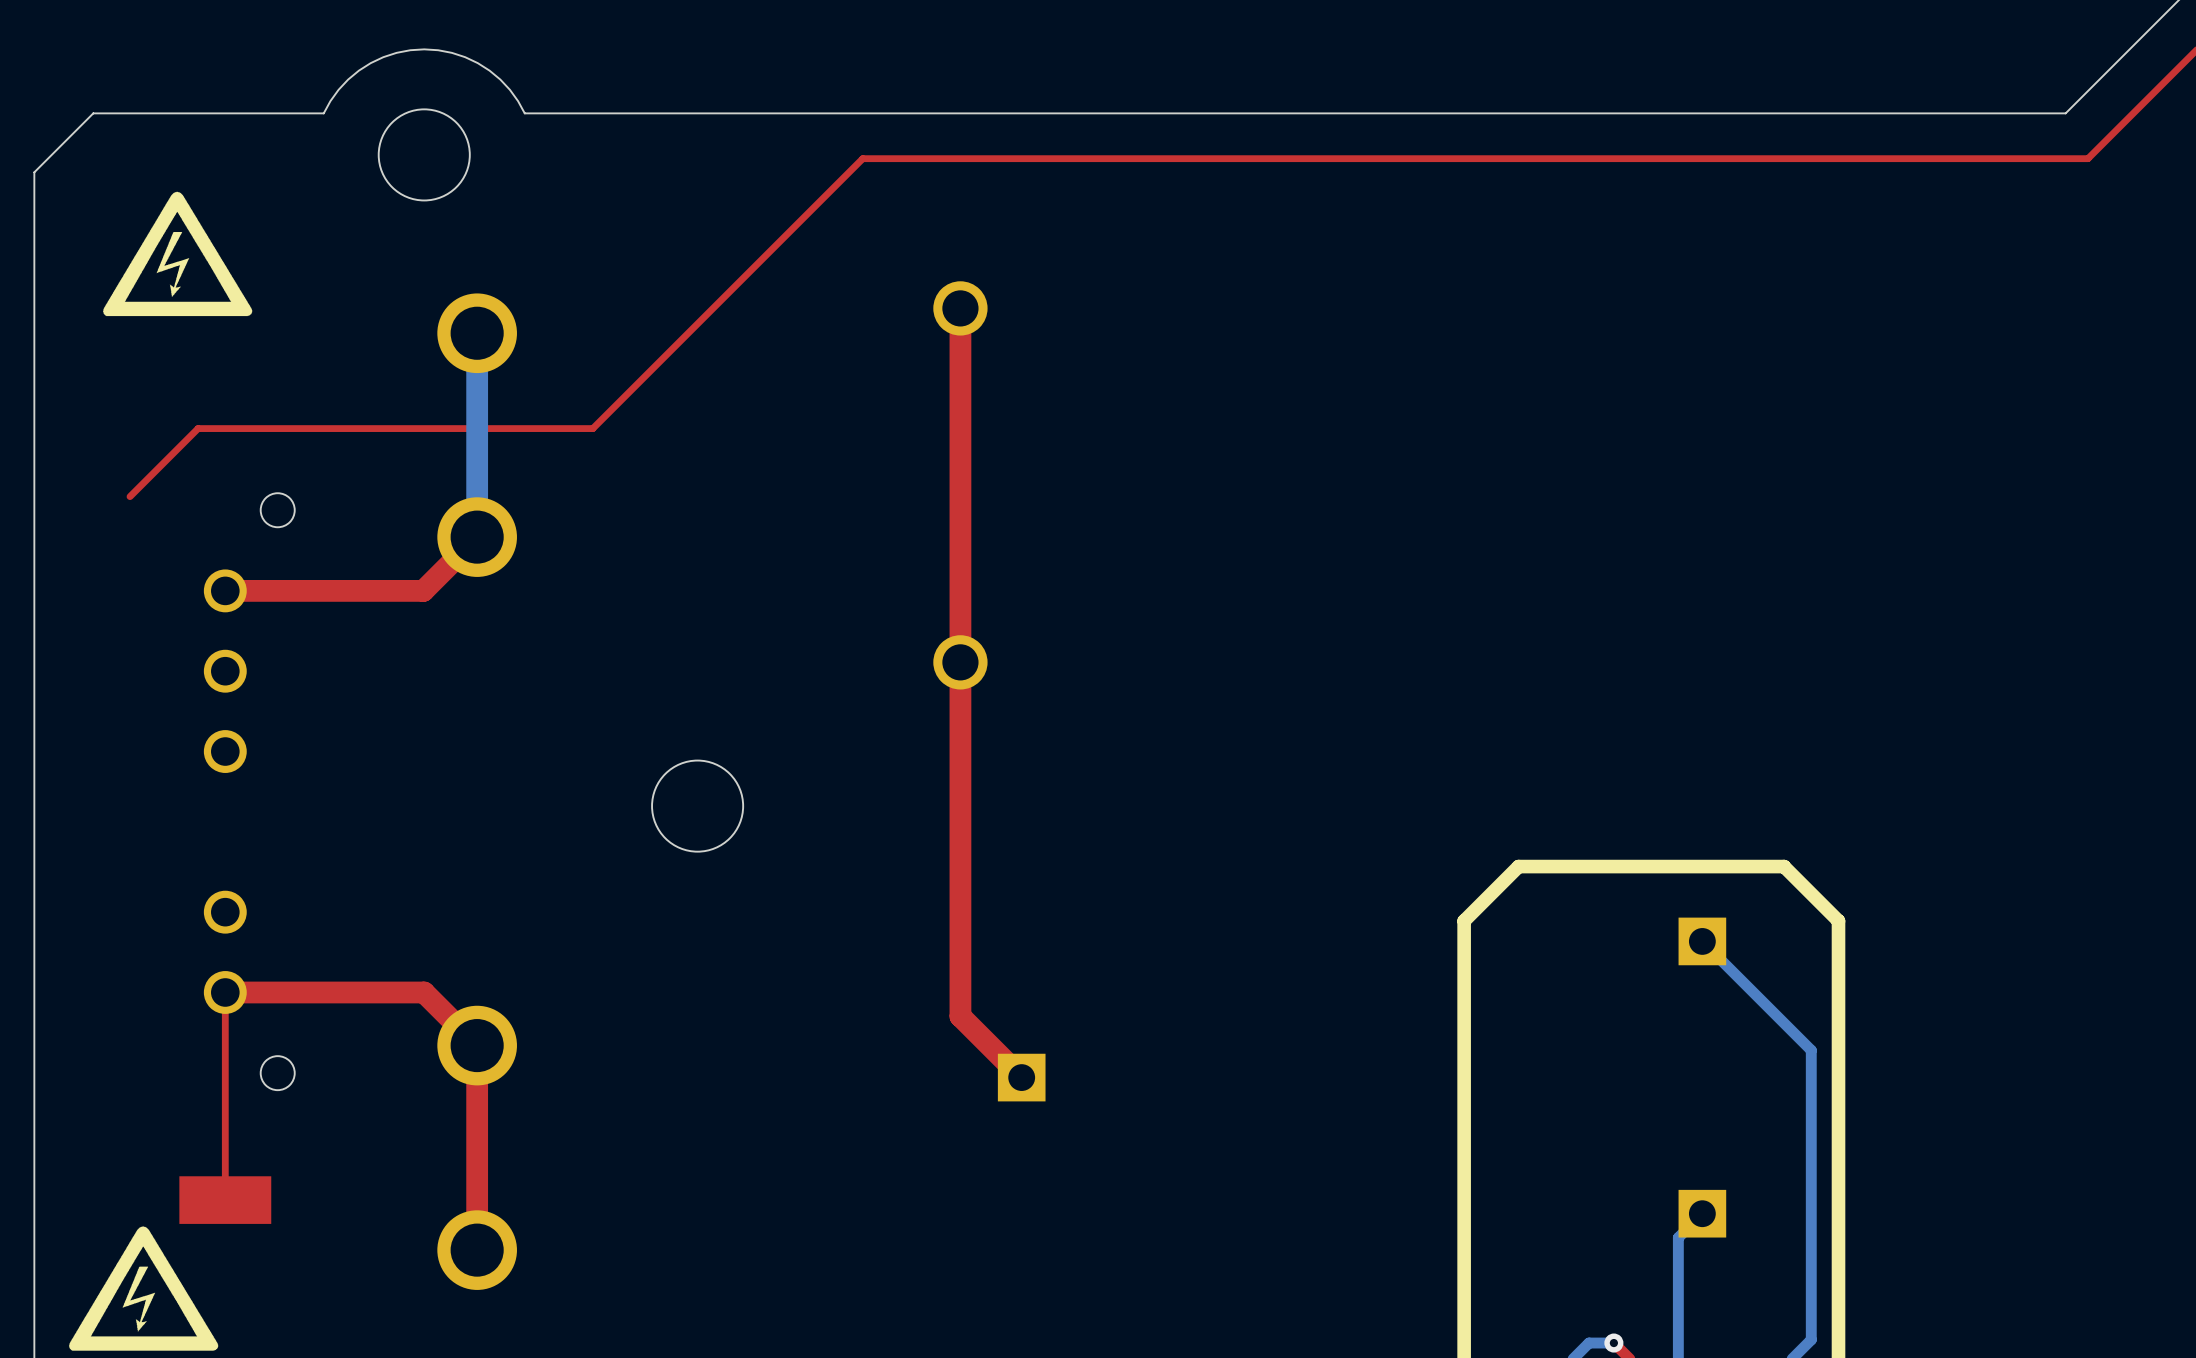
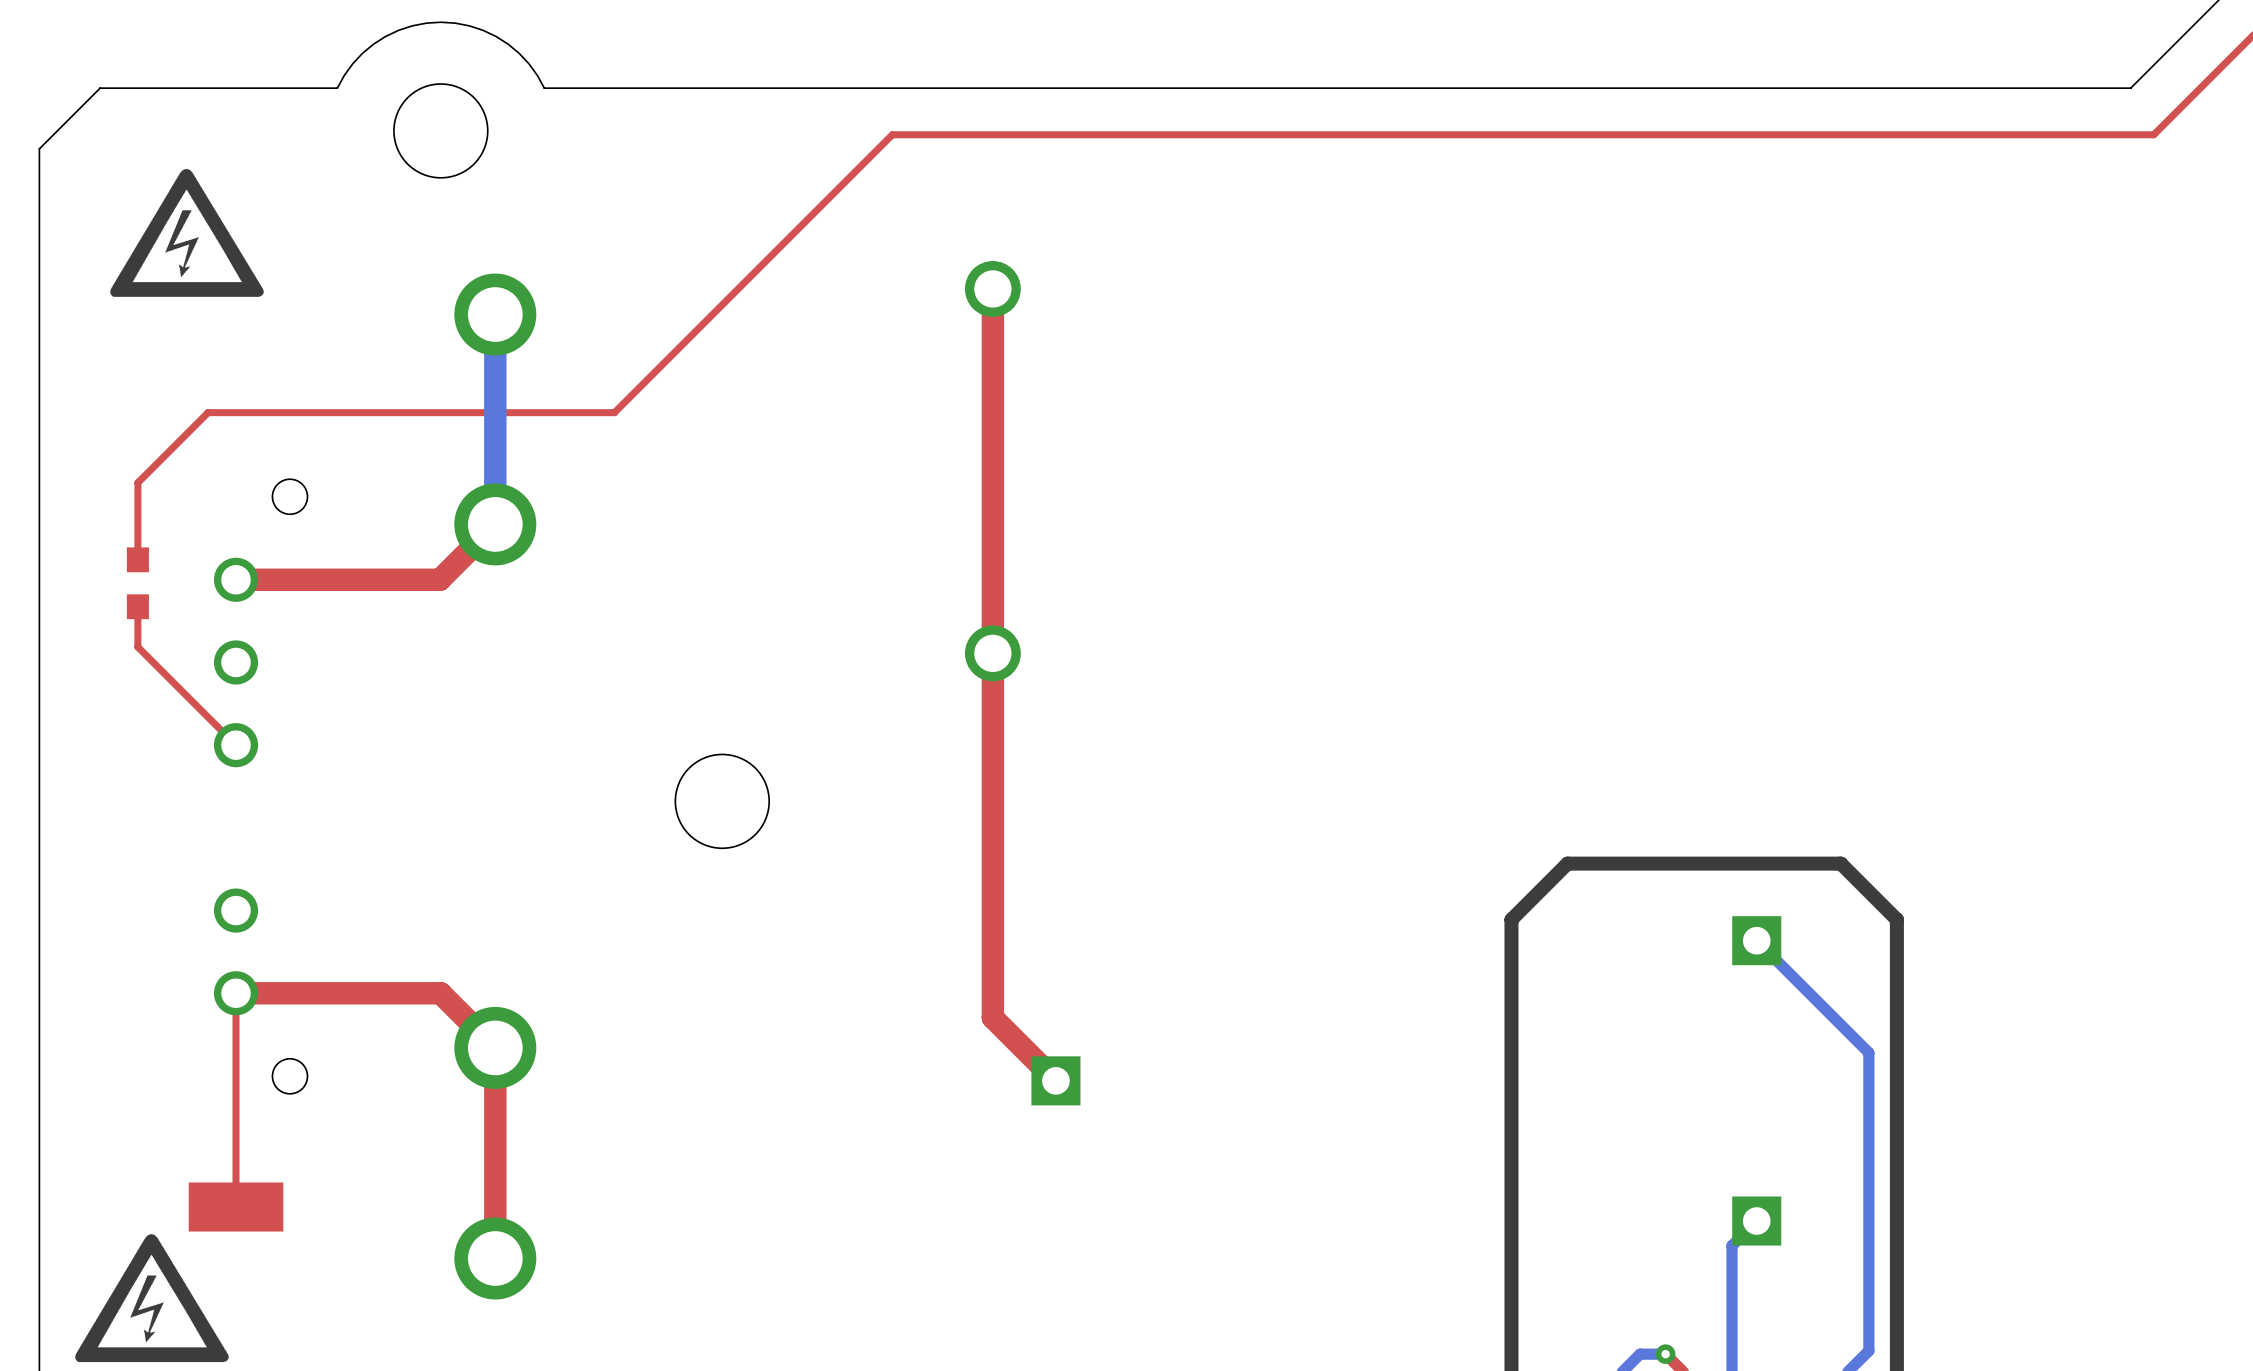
top track: none -> (137, 482) (137, 559)
part: none -> (137, 583)
top track: none -> (137, 606) (137, 647) (236, 745)

